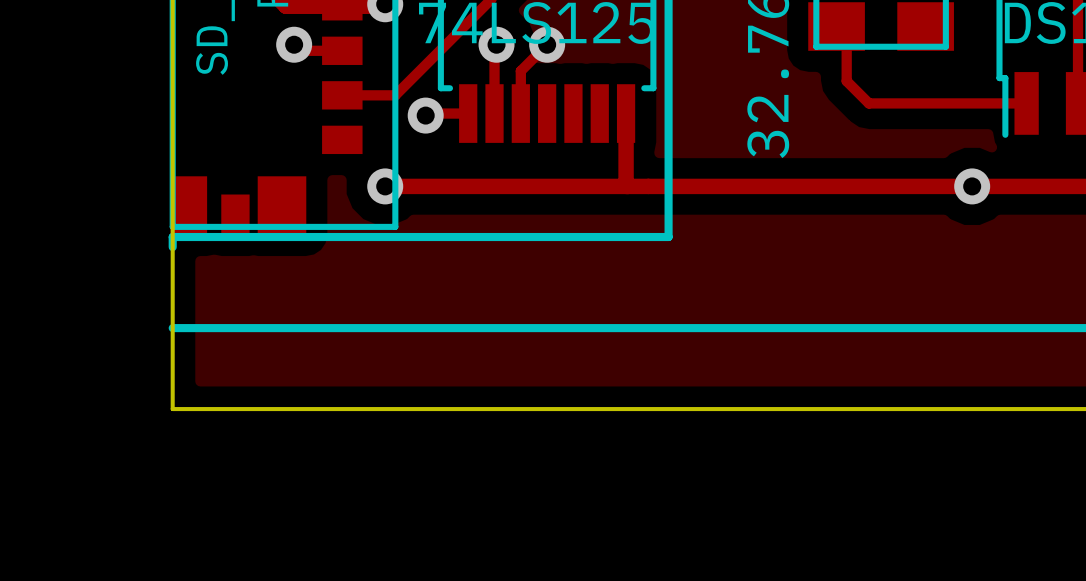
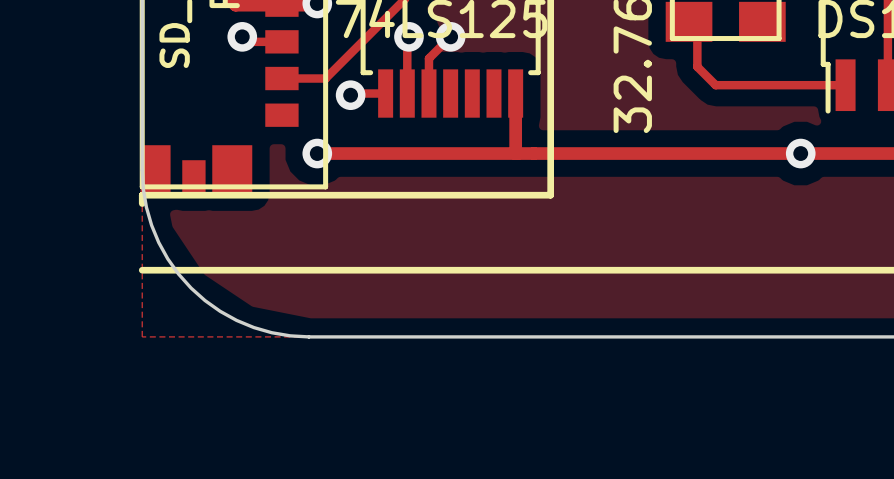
board edge: (172, 206) (172, 409) (375, 409) -> (142, 170) (143, 188) (151, 225) (167, 258) (191, 288) (220, 311) (253, 327) (290, 335) (308, 336)

